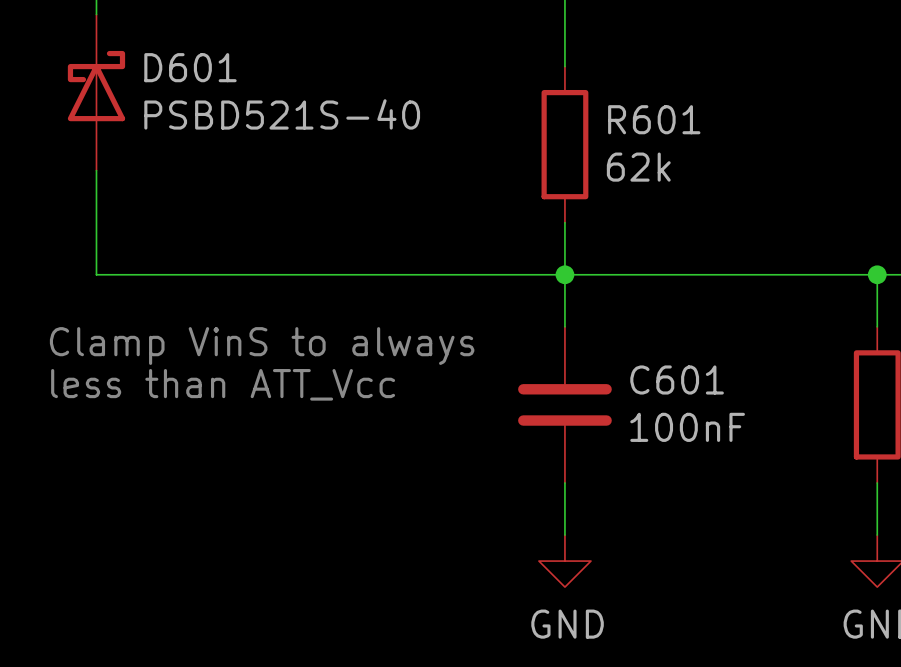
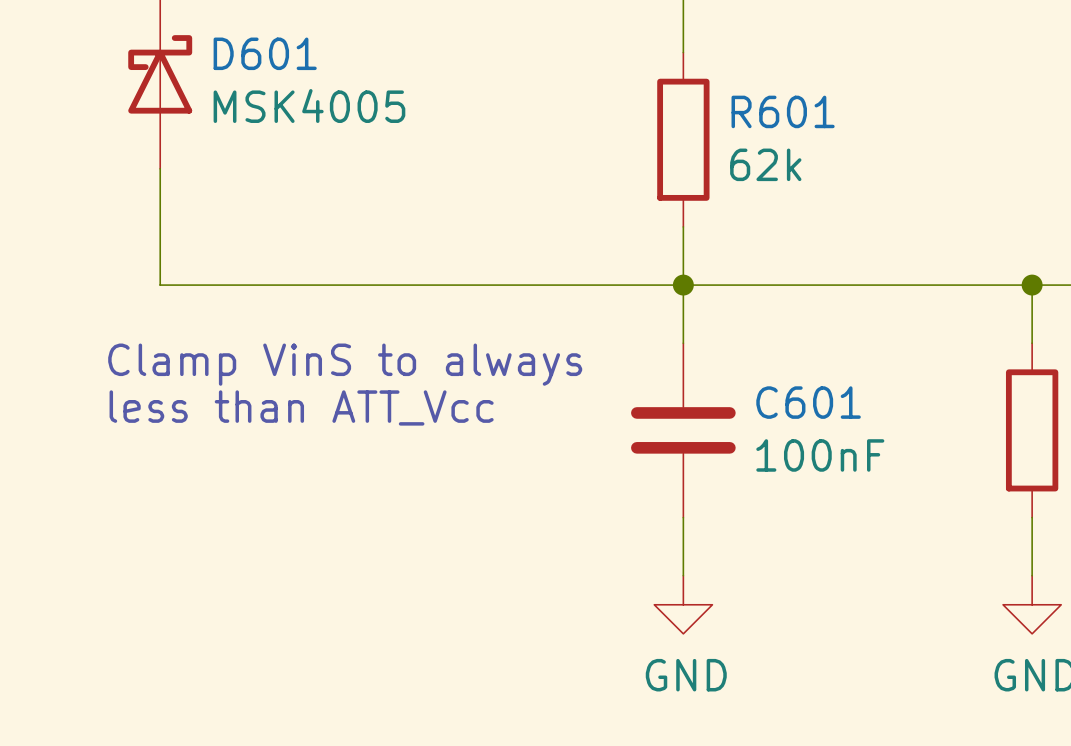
D601 value: PSBD521S-40 (282, 114) -> MSK4005 (309, 106)

